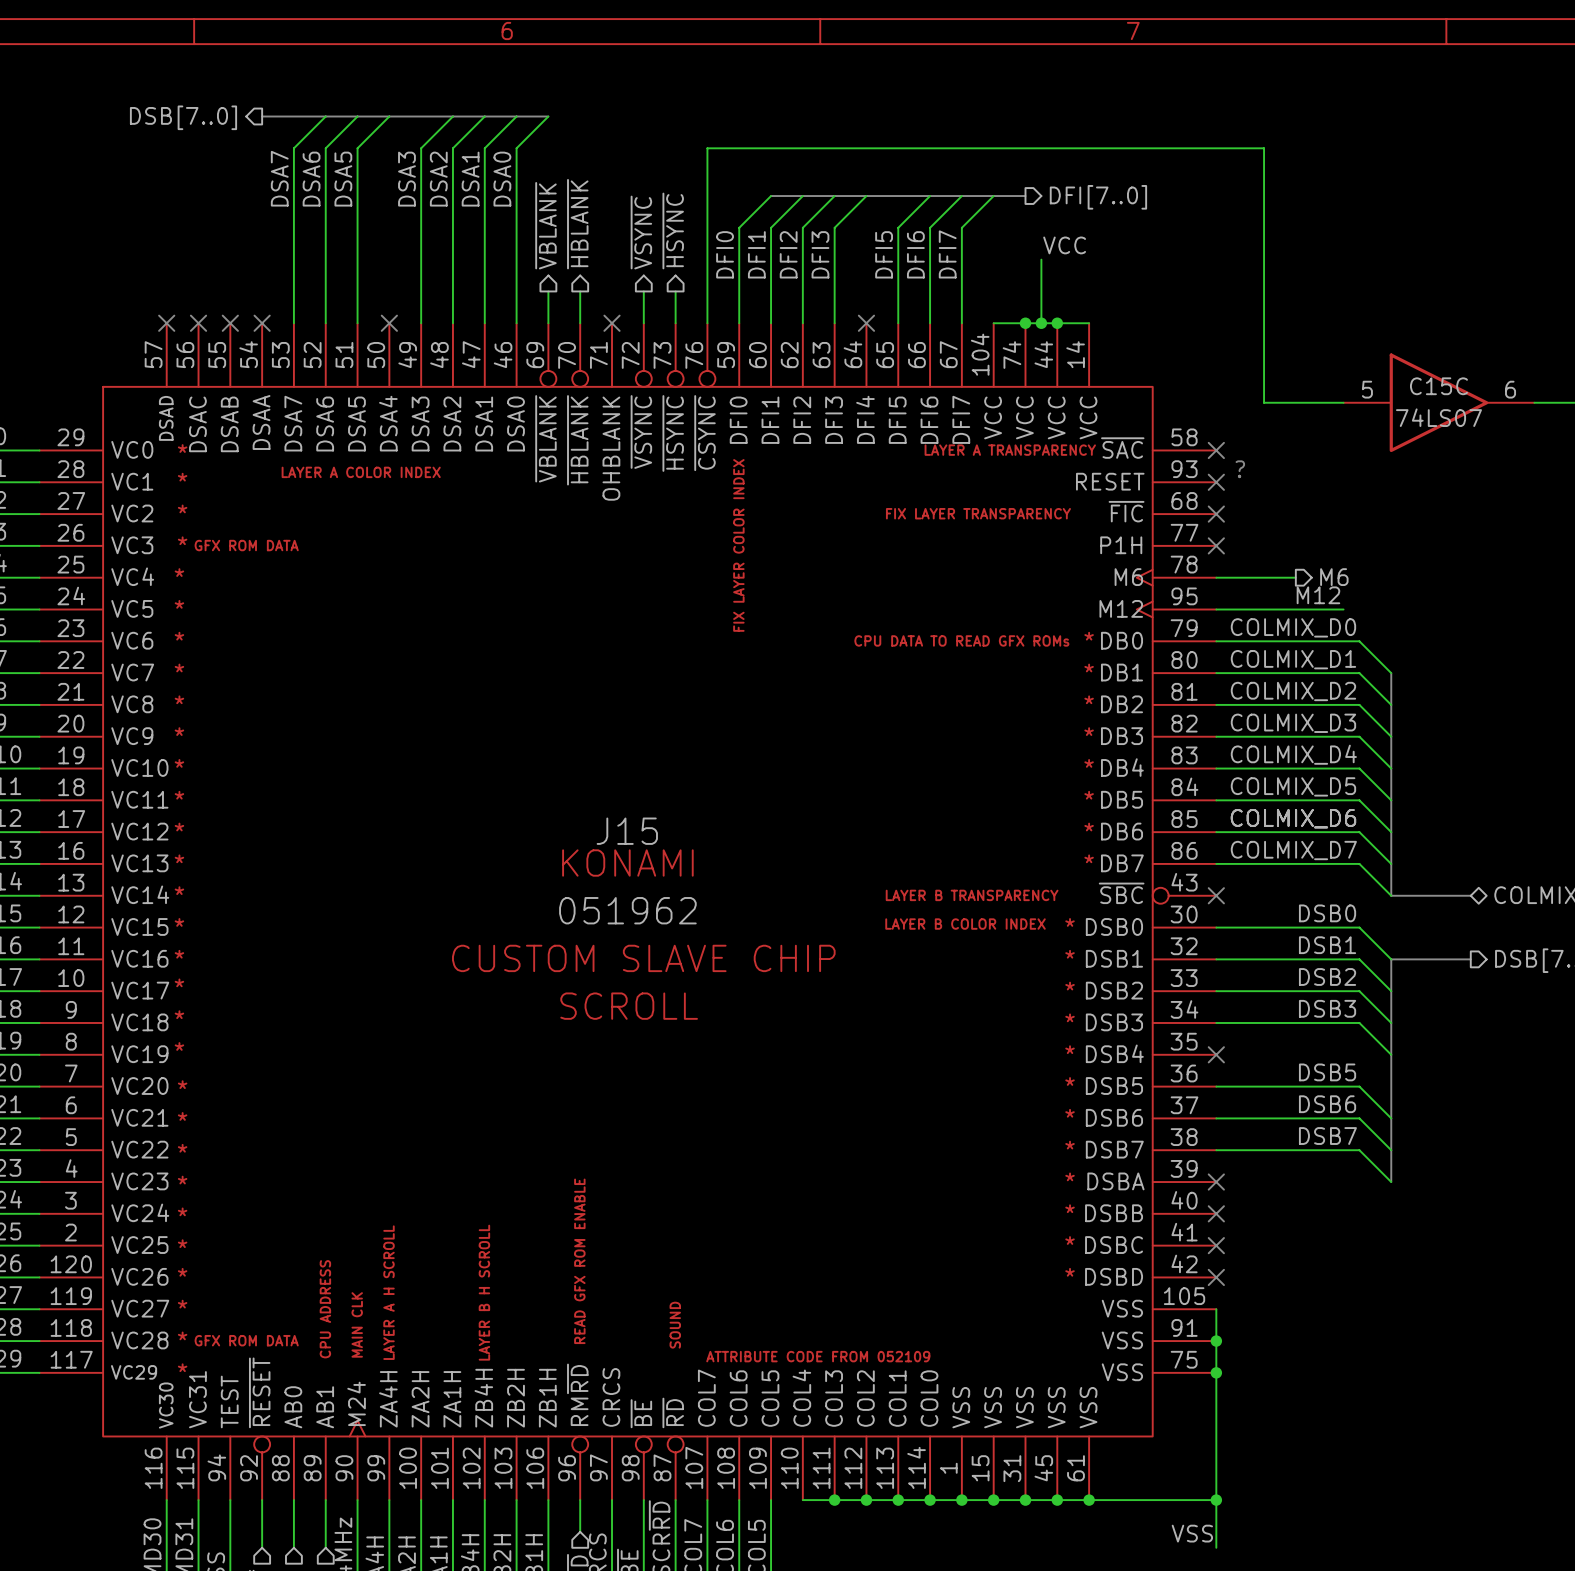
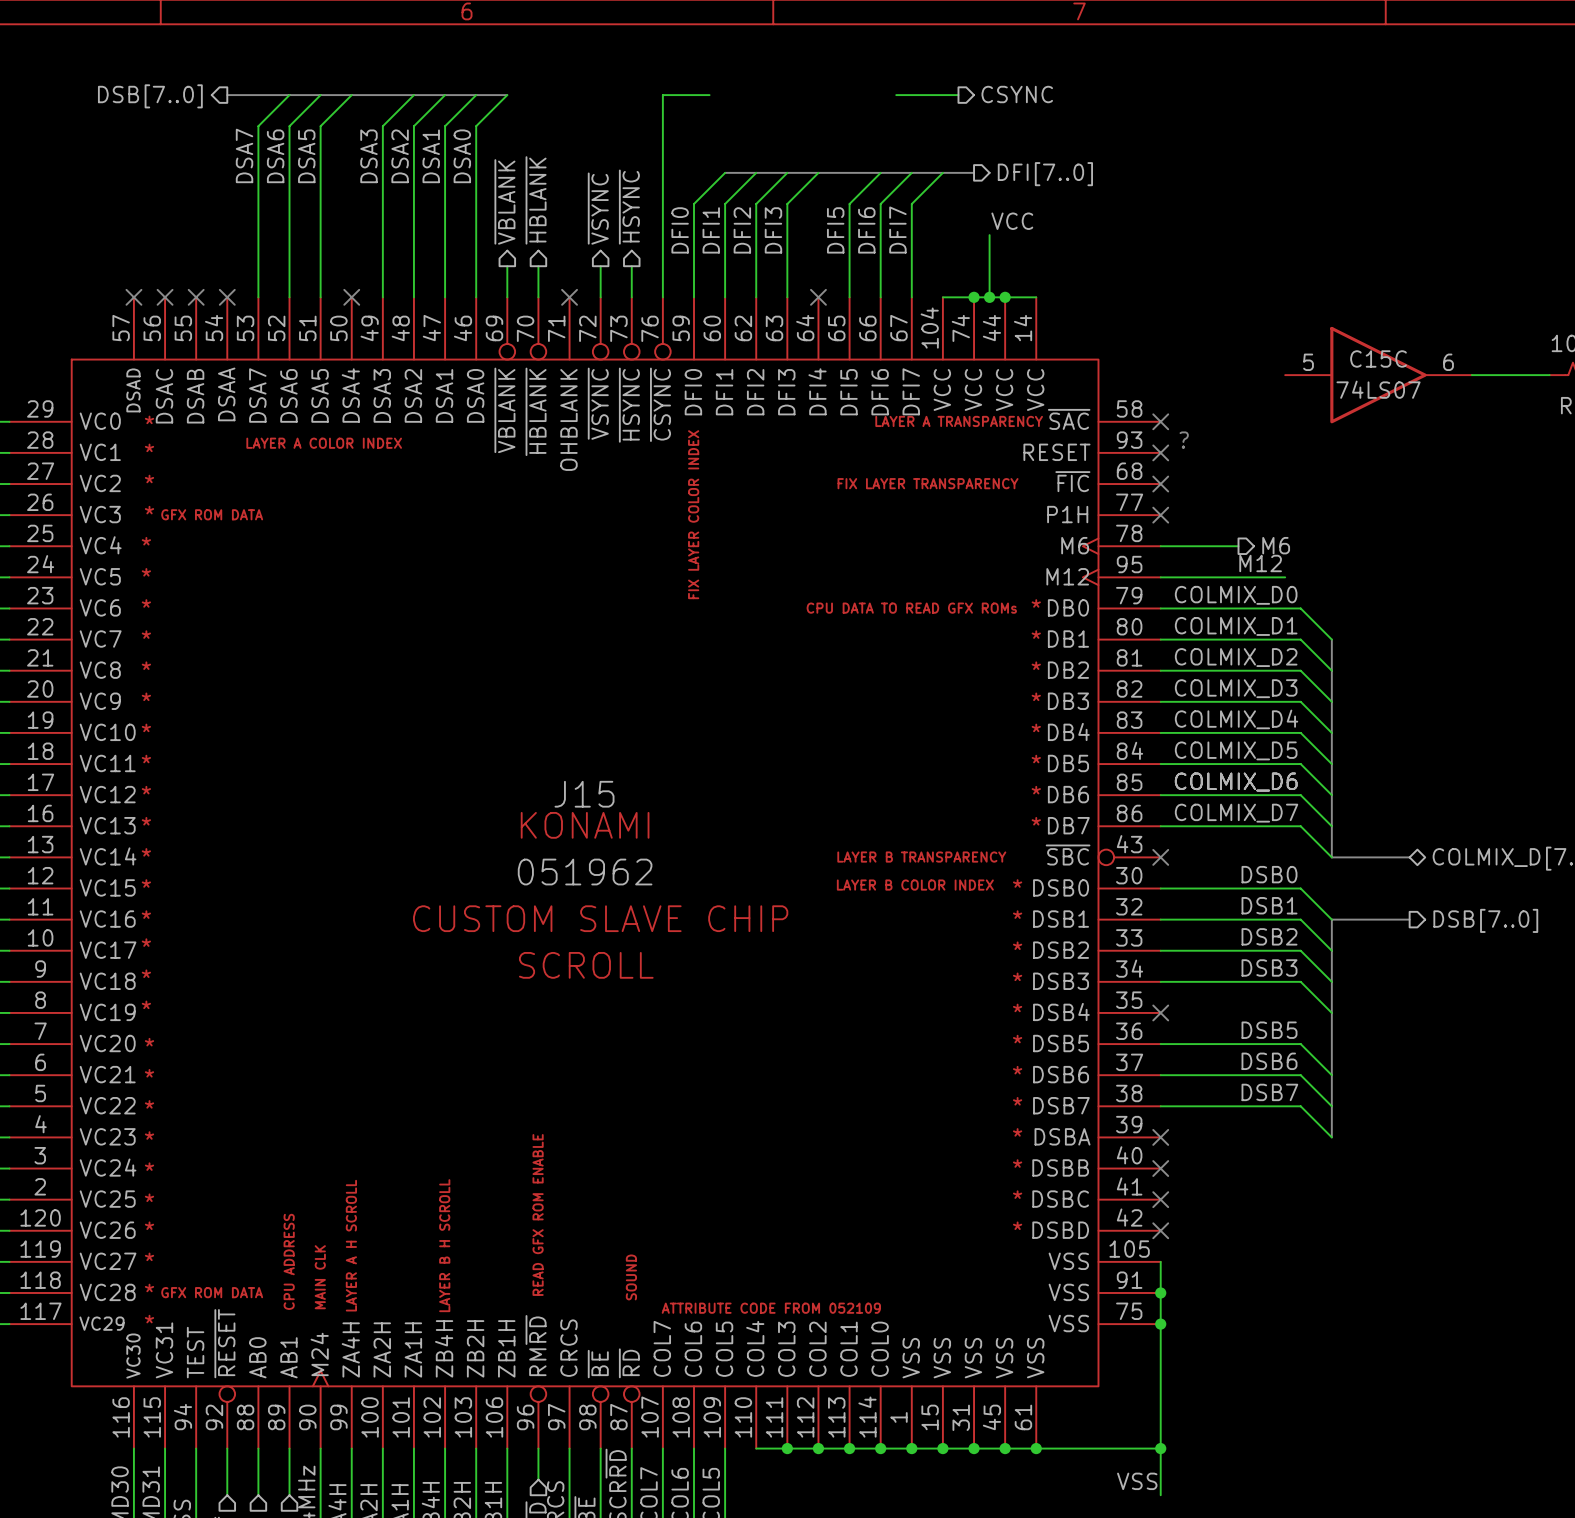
hierarchical label: none -> CSYNC (1017, 94)
wire: none -> (896, 95) (958, 95)
wire: (707, 148) (1264, 148) (1264, 402) (1343, 402) -> (662, 126) (662, 95) (709, 95)

